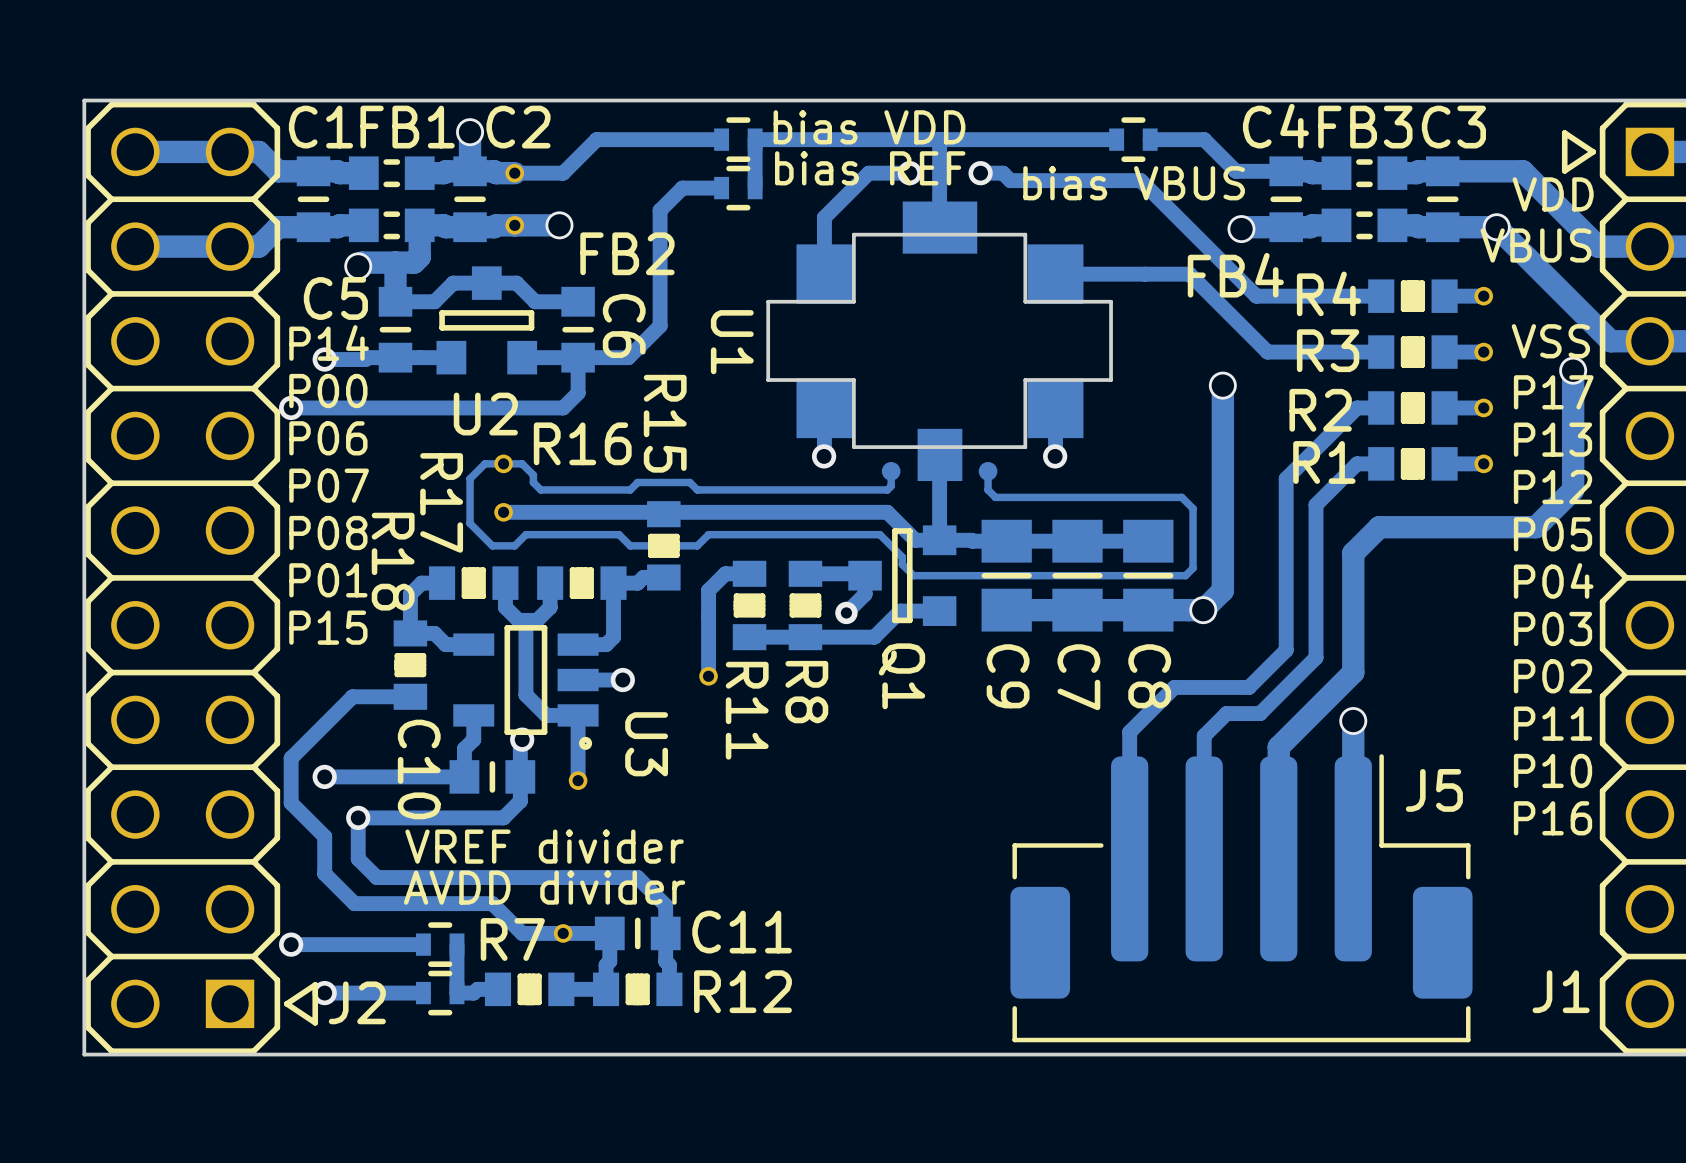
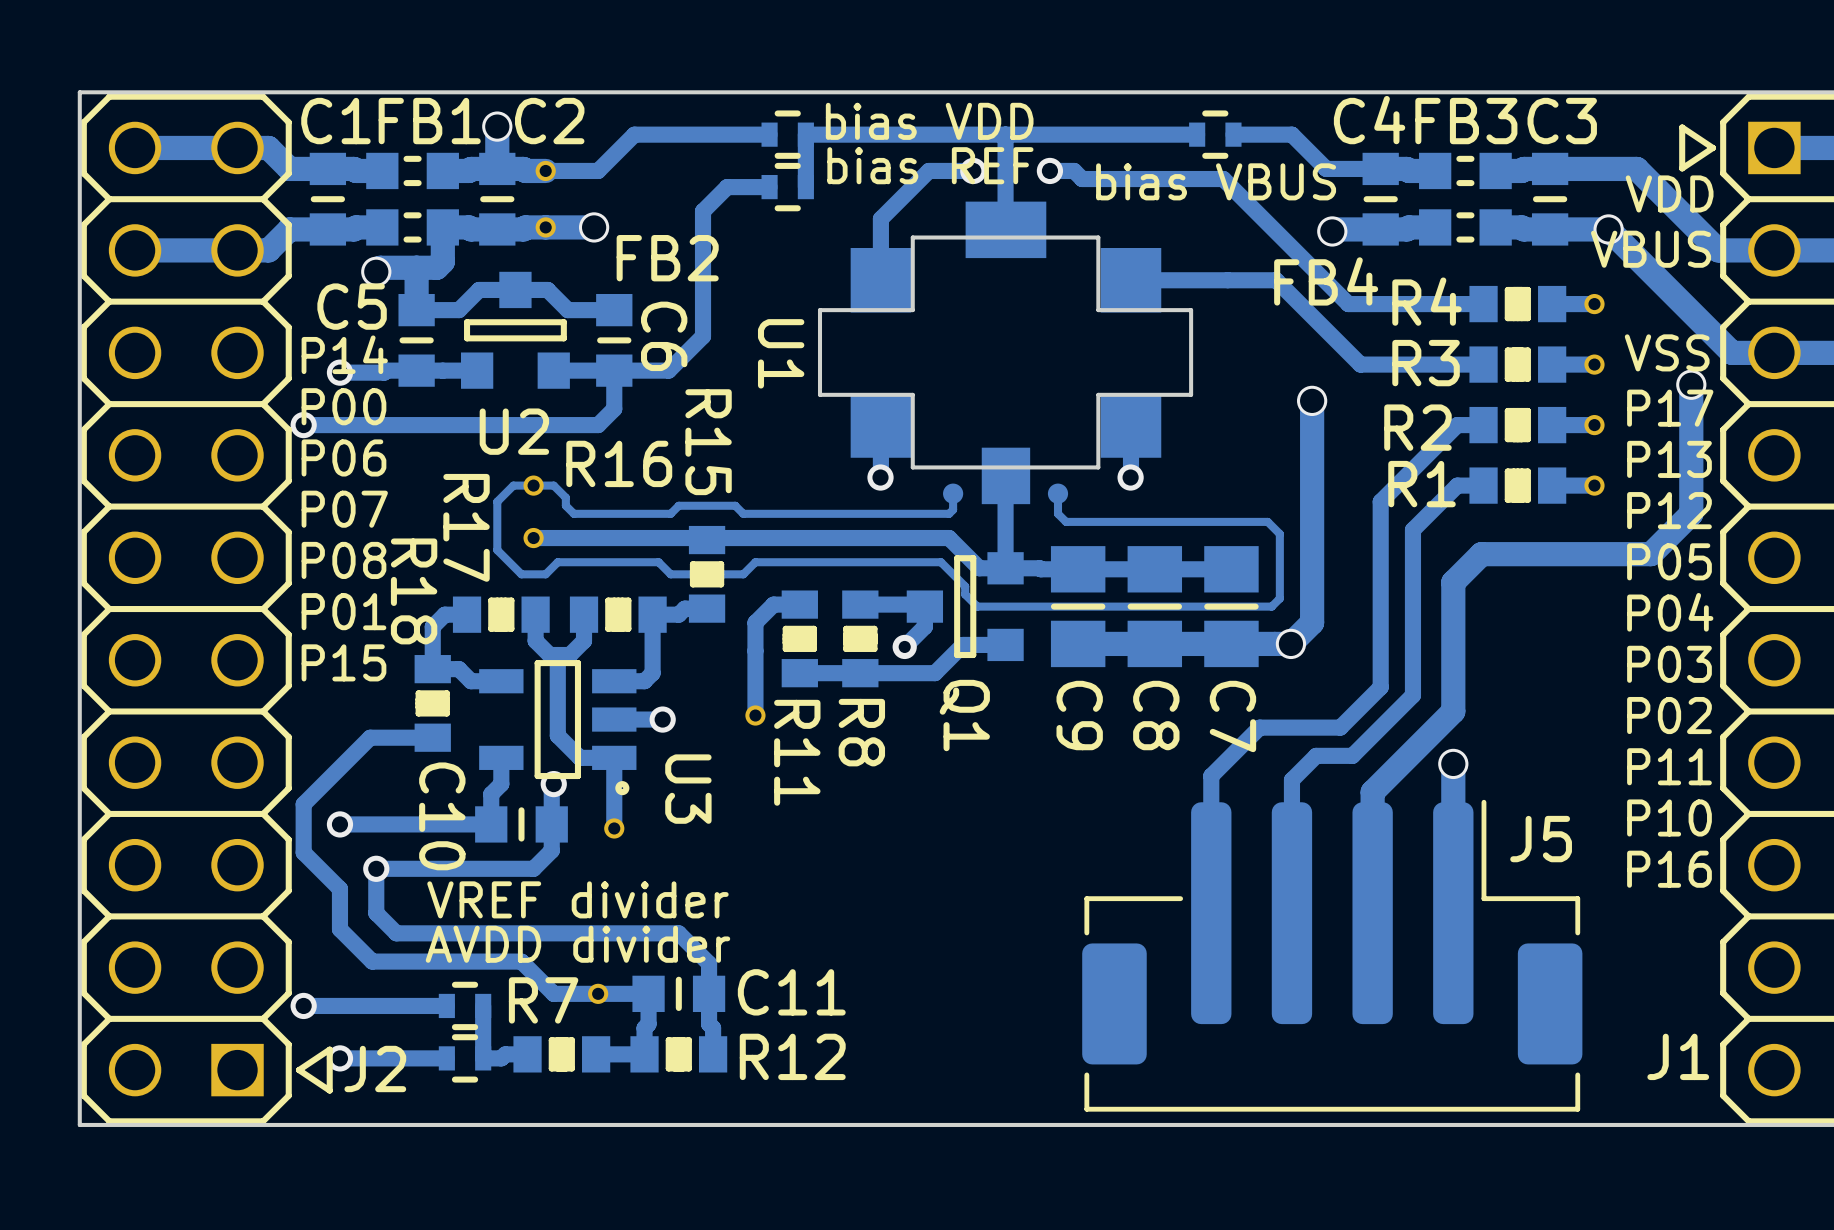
C8 name: C8 (1149, 676) -> C7 (1232, 716)
C7 name: C7 (1078, 677) -> C8 (1156, 715)

